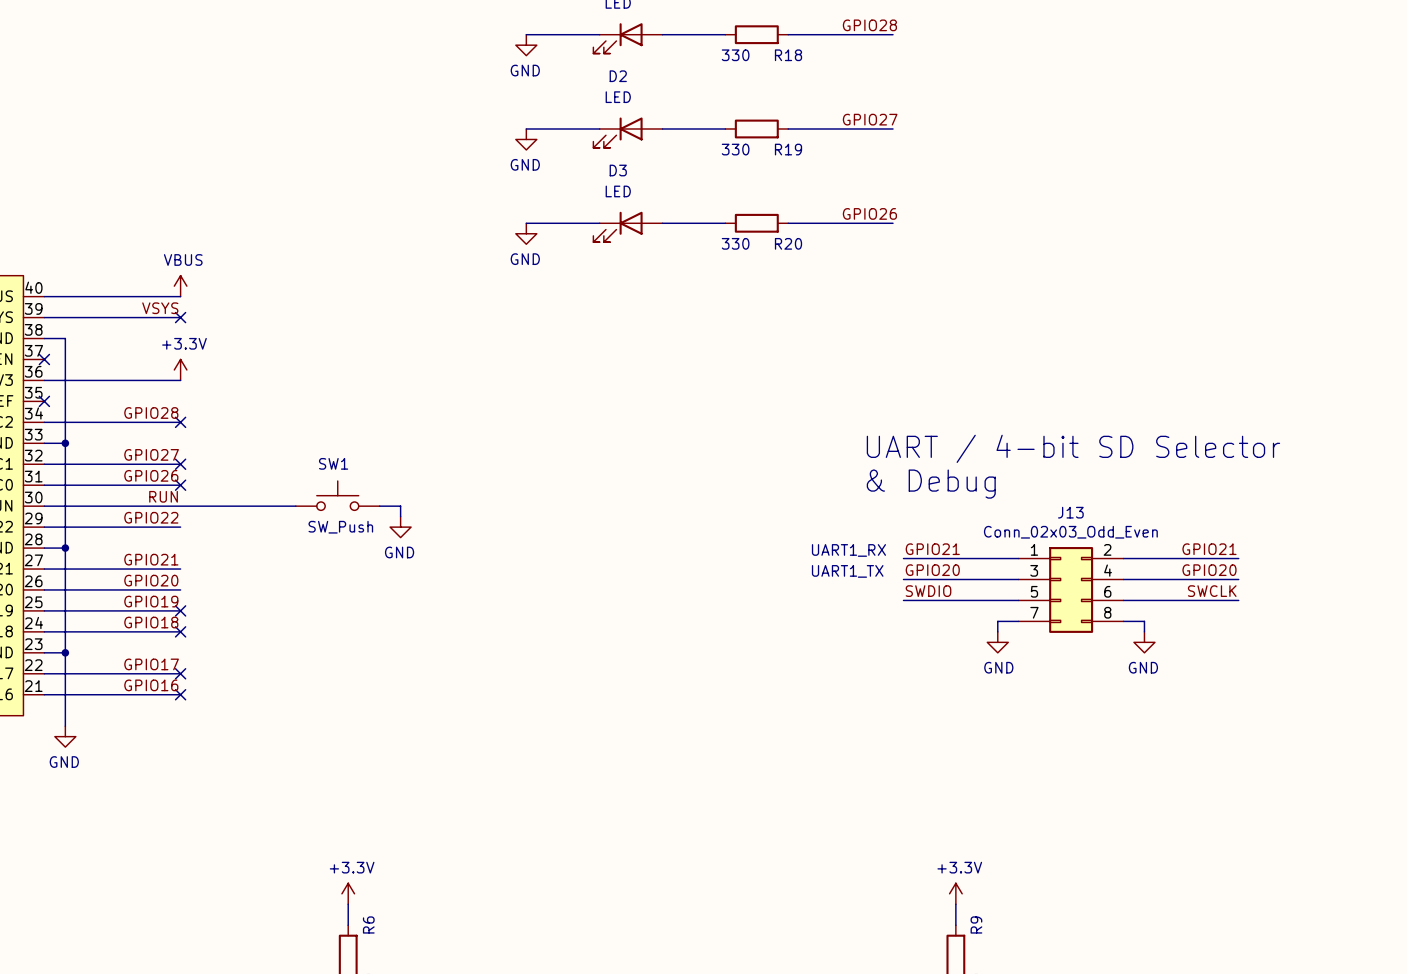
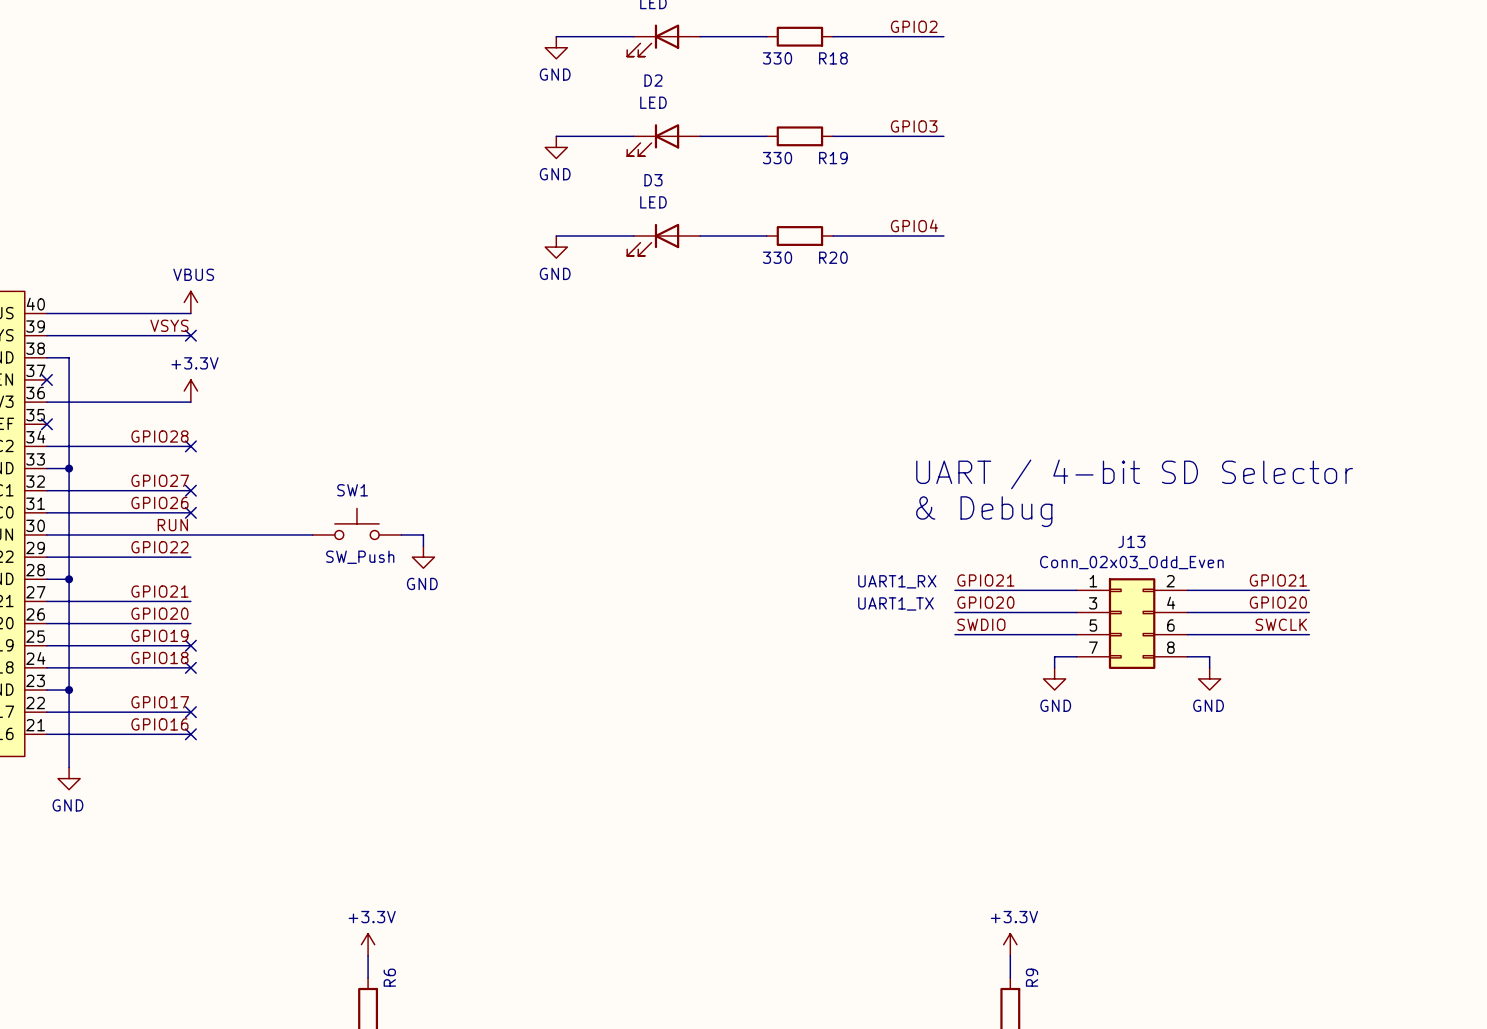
label: GPIO28 (869, 25) -> GPIO2 (914, 26)
label: GPIO27 (870, 119) -> GPIO3 (914, 126)
label: GPIO26 (869, 213) -> GPIO4 (914, 225)

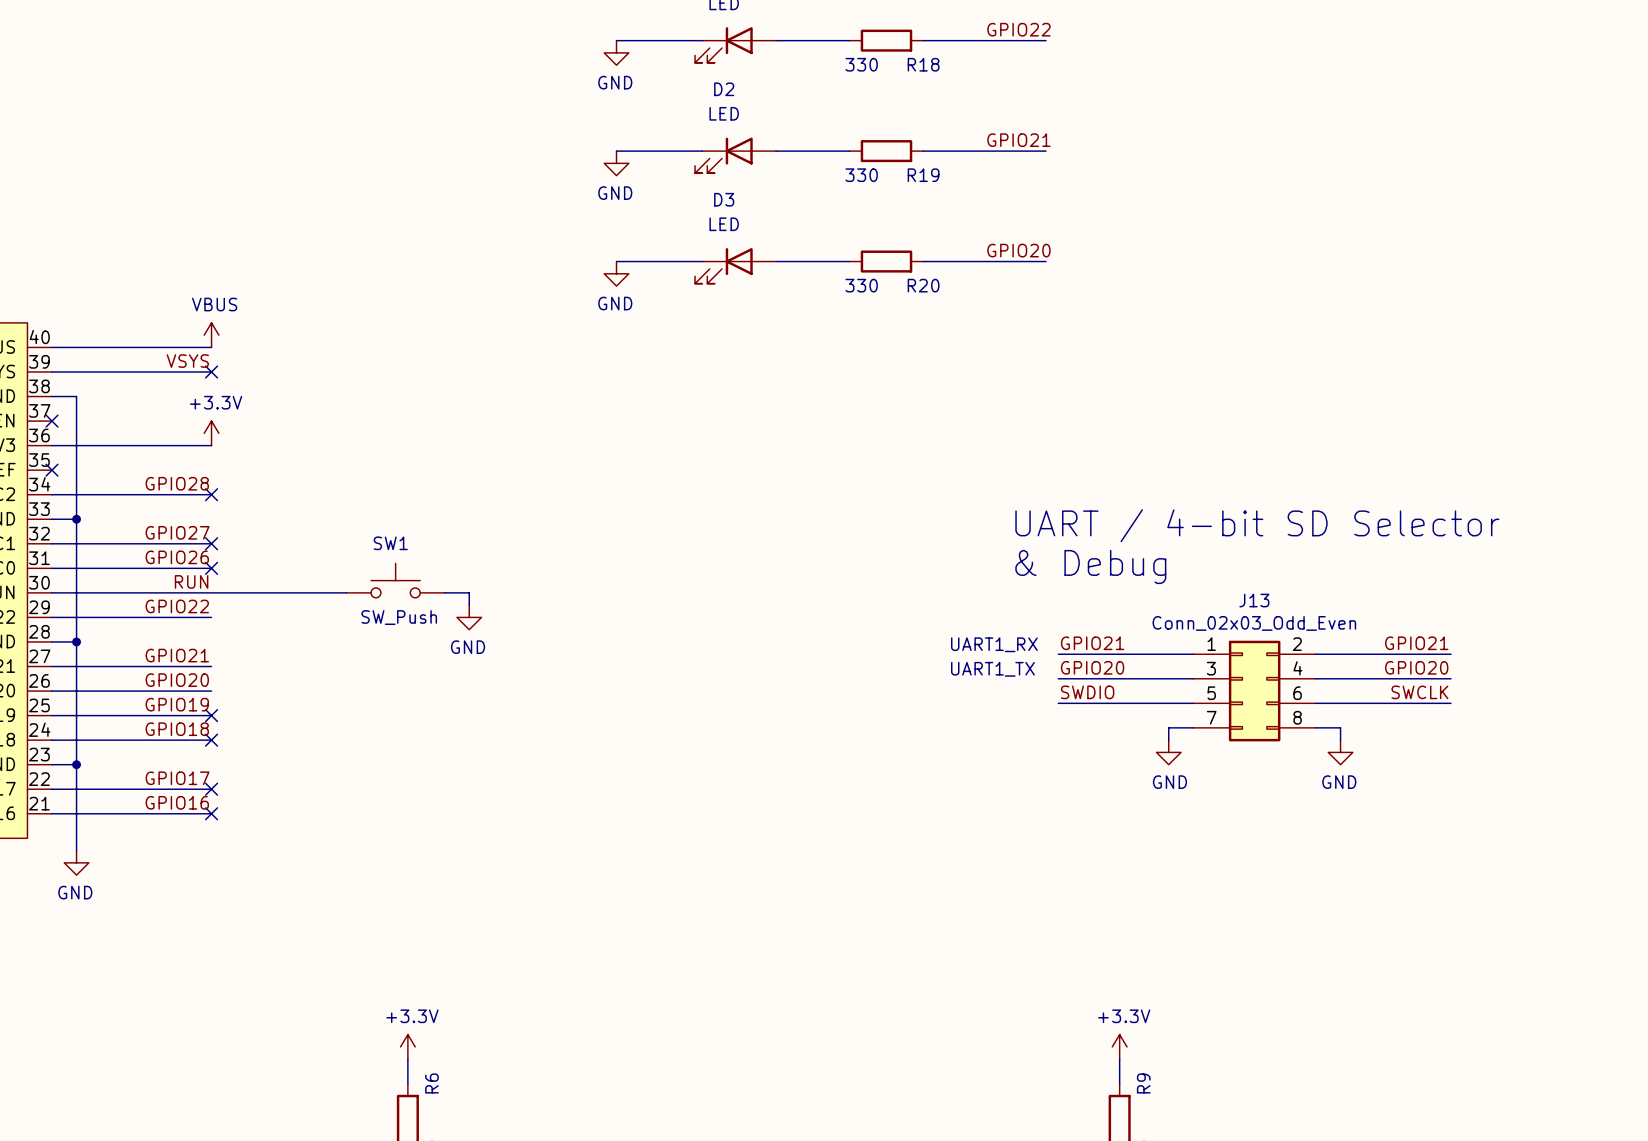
label: GPIO2 (914, 26) -> GPIO22 (1018, 29)
label: GPIO3 (914, 126) -> GPIO21 (1018, 140)
label: GPIO4 (914, 225) -> GPIO20 (1018, 250)

